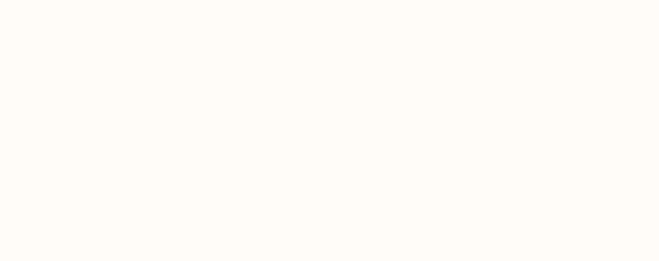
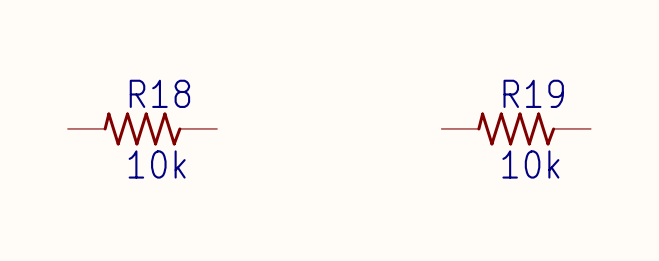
R18: none -> 10k (142, 128)
R19: none -> 10k (516, 128)

